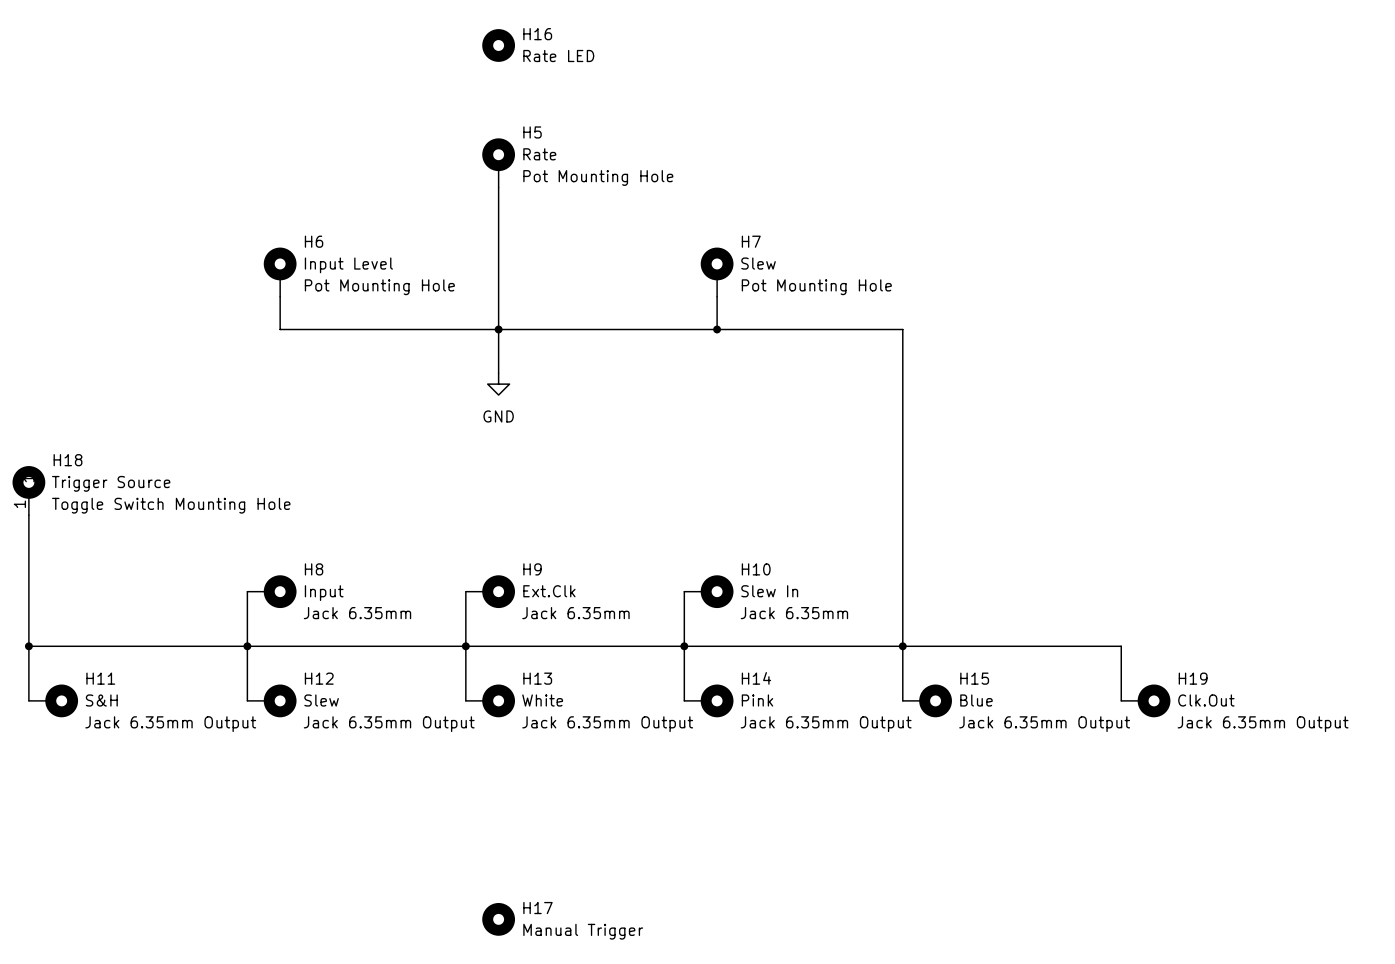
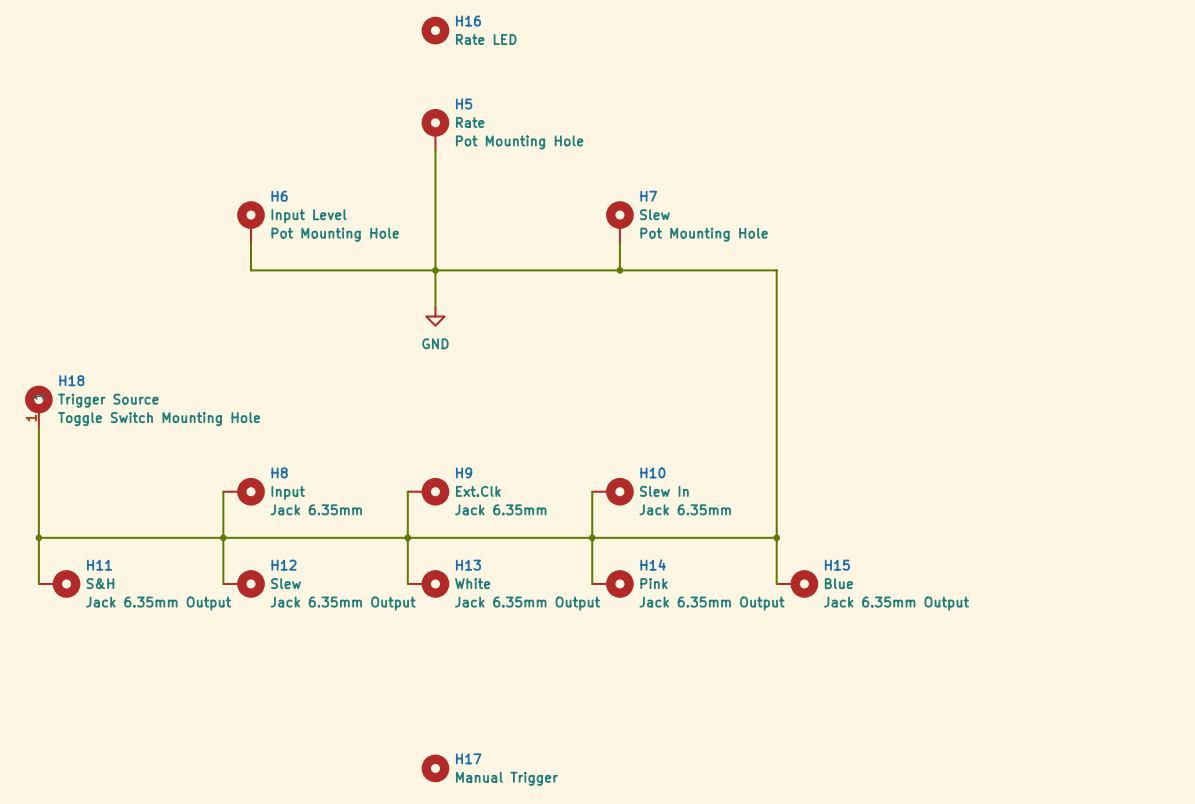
wire: (902, 646) (1121, 646) (1121, 700) -> none
H19: Clk.Out (1145, 700) -> none

